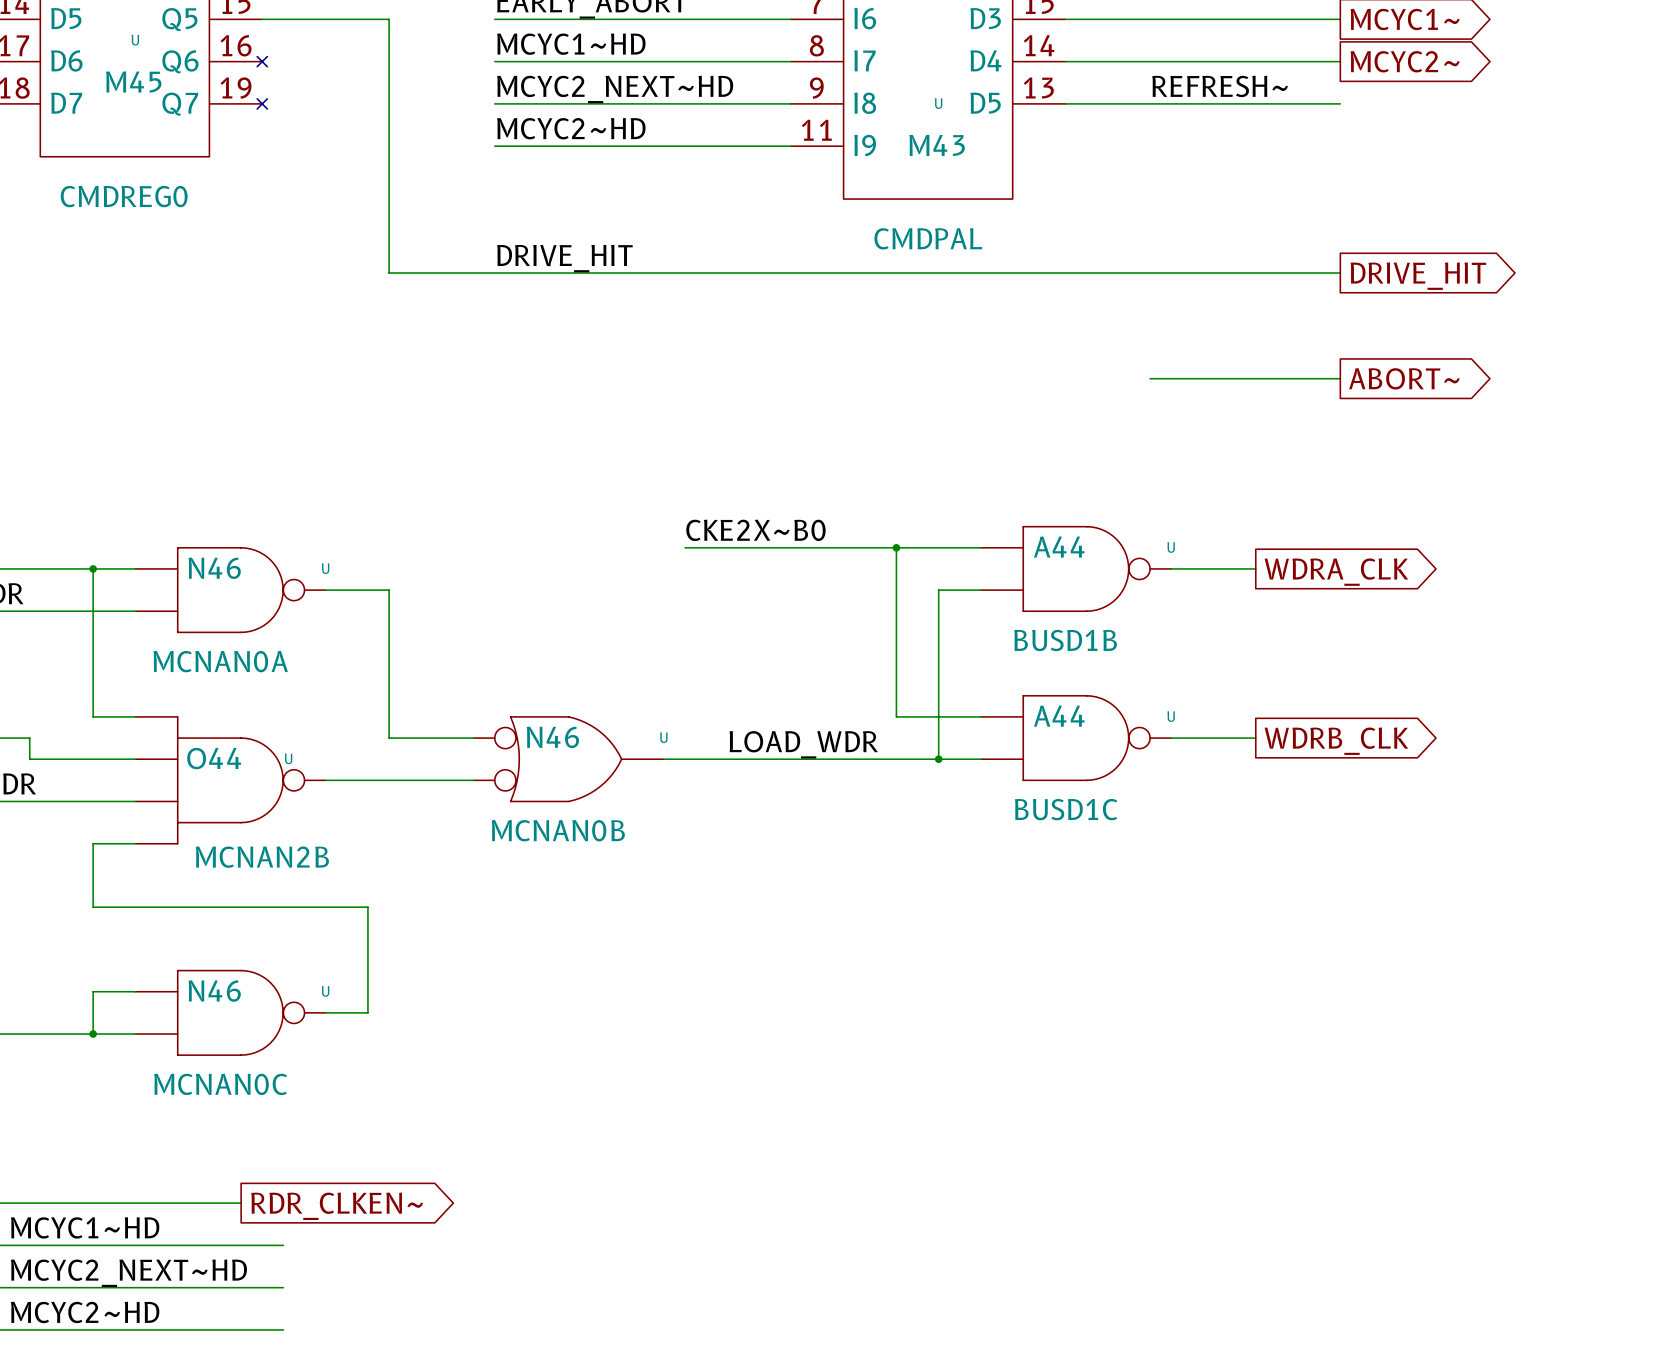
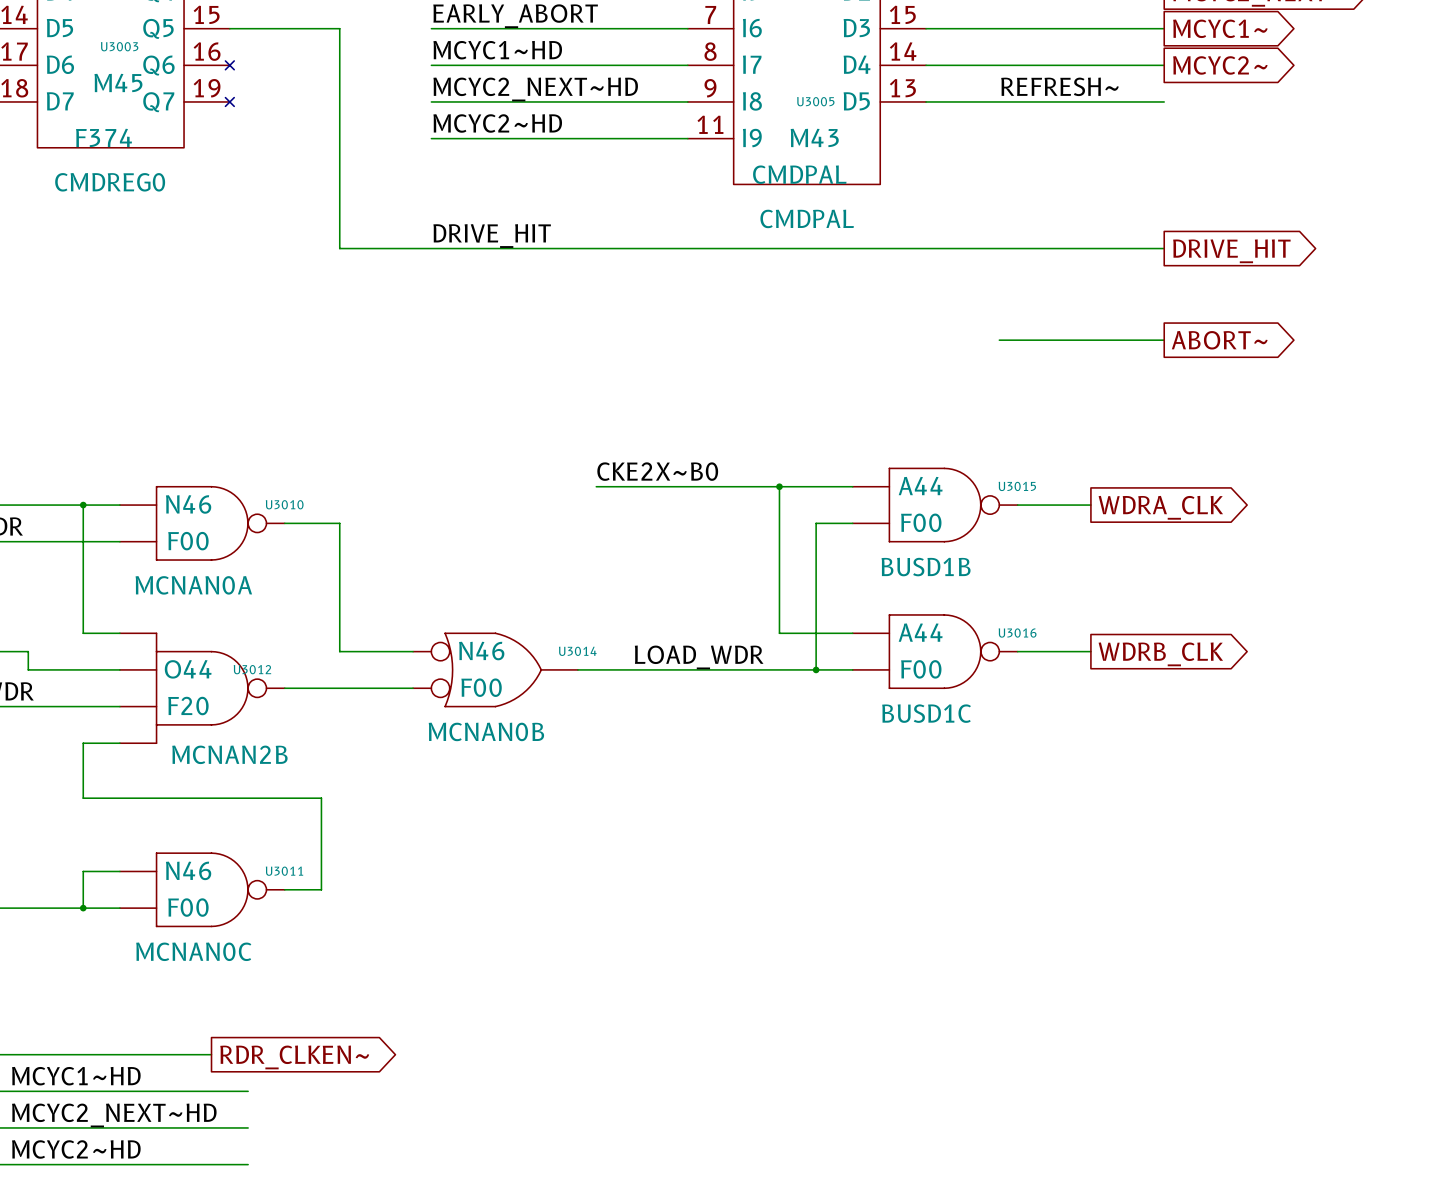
U name: U (135, 40) -> U3003 (119, 46)
U name: U (938, 103) -> U3005 (815, 101)
U value: none -> F374 (103, 137)
U value: none -> CMDPAL (799, 174)
U name: U (1171, 547) -> U3015 (1017, 486)
U name: U (325, 568) -> U3010 (284, 504)
U value: none -> F00 (921, 522)
U value: none -> F00 (188, 541)
U name: U (1171, 716) -> U3016 (1017, 633)
U name: U (663, 737) -> U3014 (577, 651)
U name: U (288, 758) -> U3012 (252, 669)
U value: none -> F00 (921, 669)
U value: none -> F00 (481, 687)
U value: none -> F20 (188, 706)
U name: U (325, 991) -> U3011 (284, 871)
U value: none -> F00 (188, 907)

